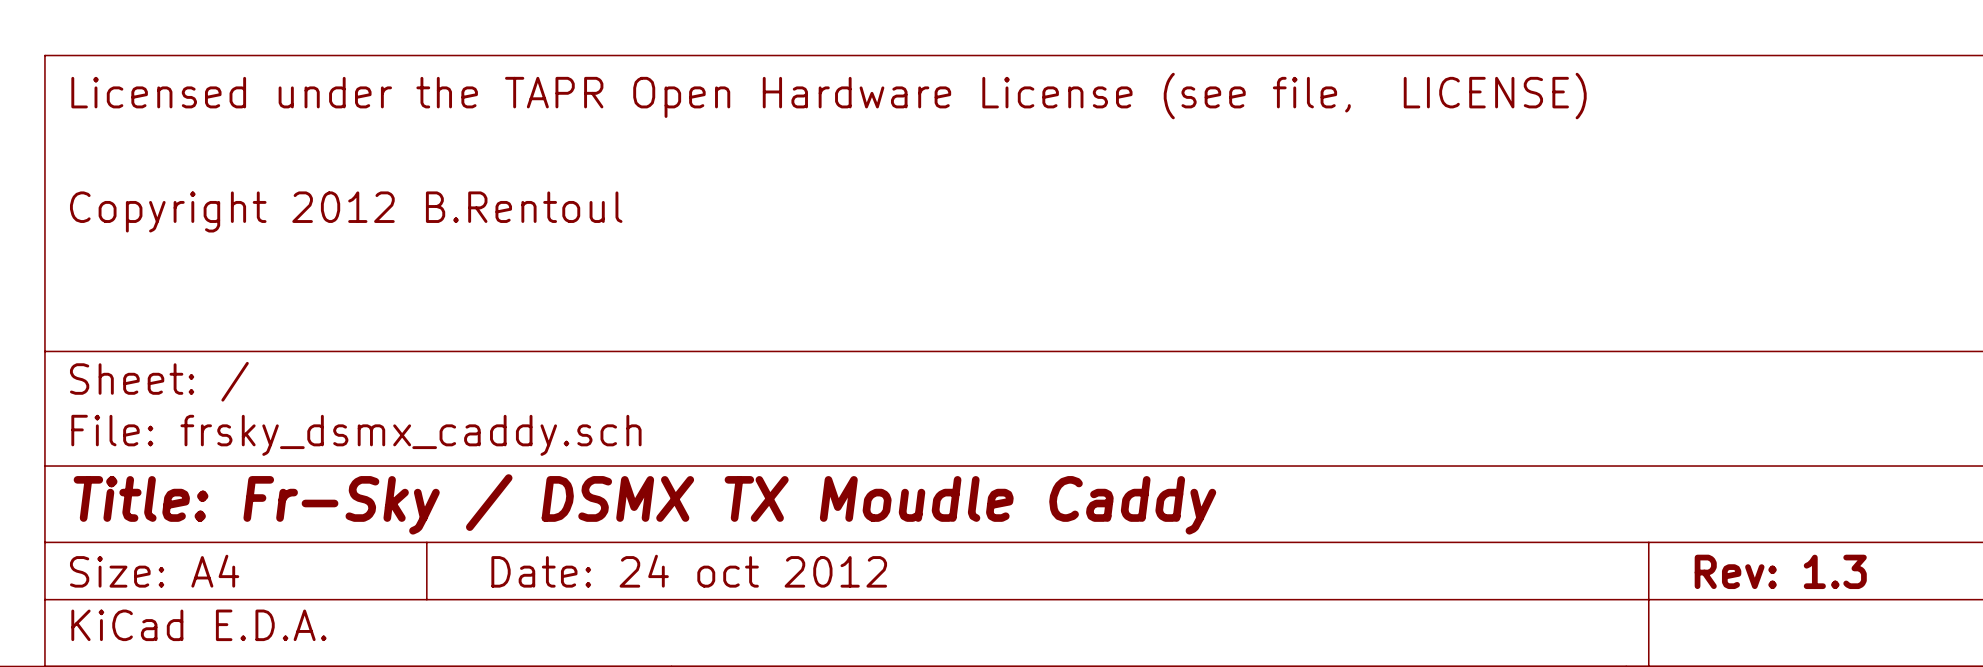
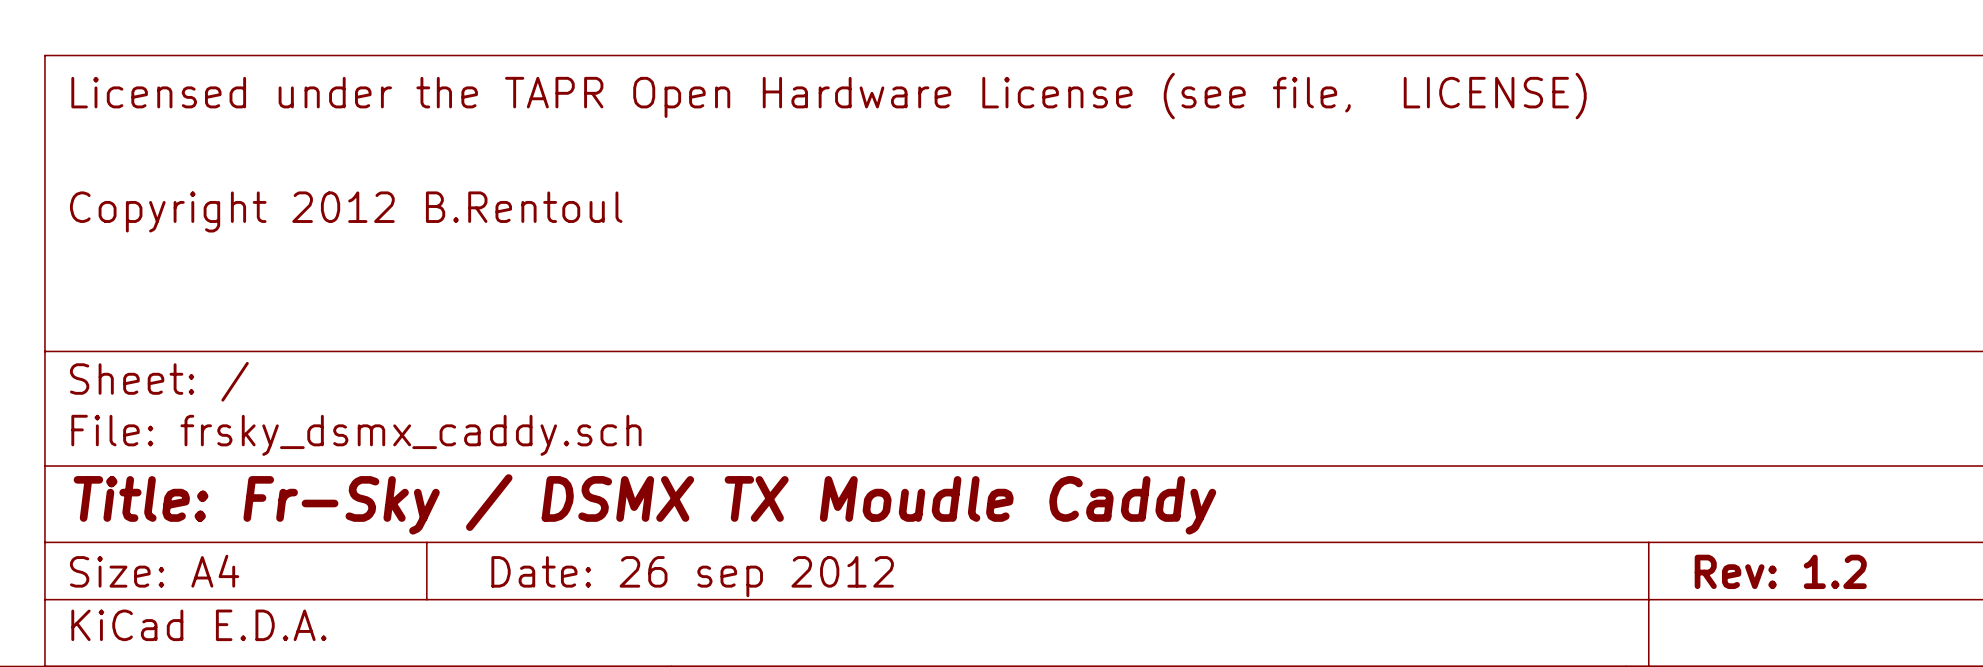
title block: Date: 24 oct 2012 (689, 571) -> Date: 26 sep 2012 (692, 576)
title block: Rev: 1.3 (1780, 571) -> Rev: 1.2 (1780, 571)

